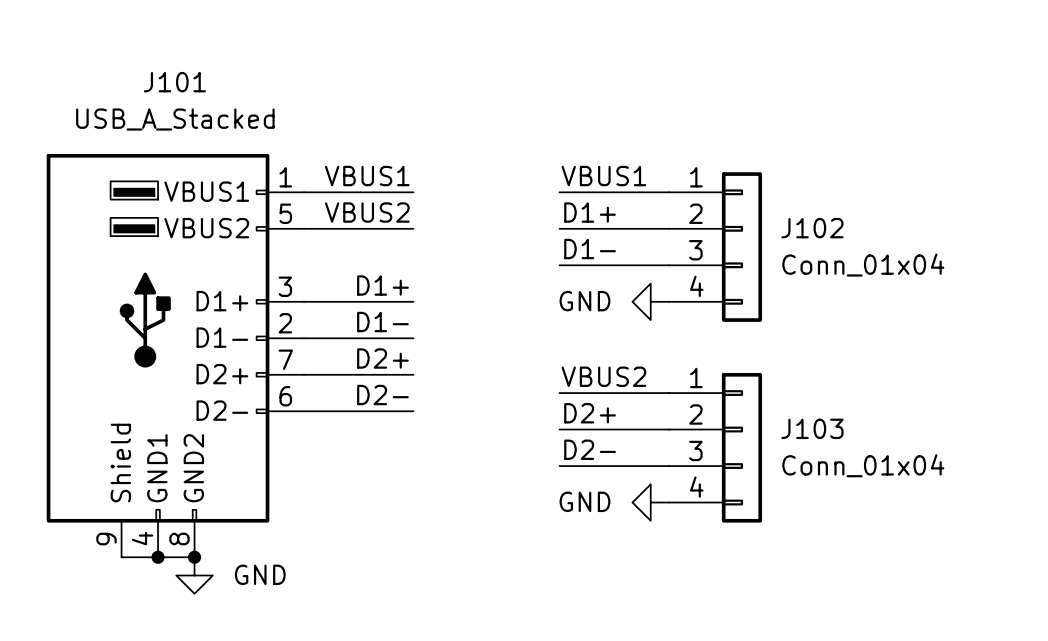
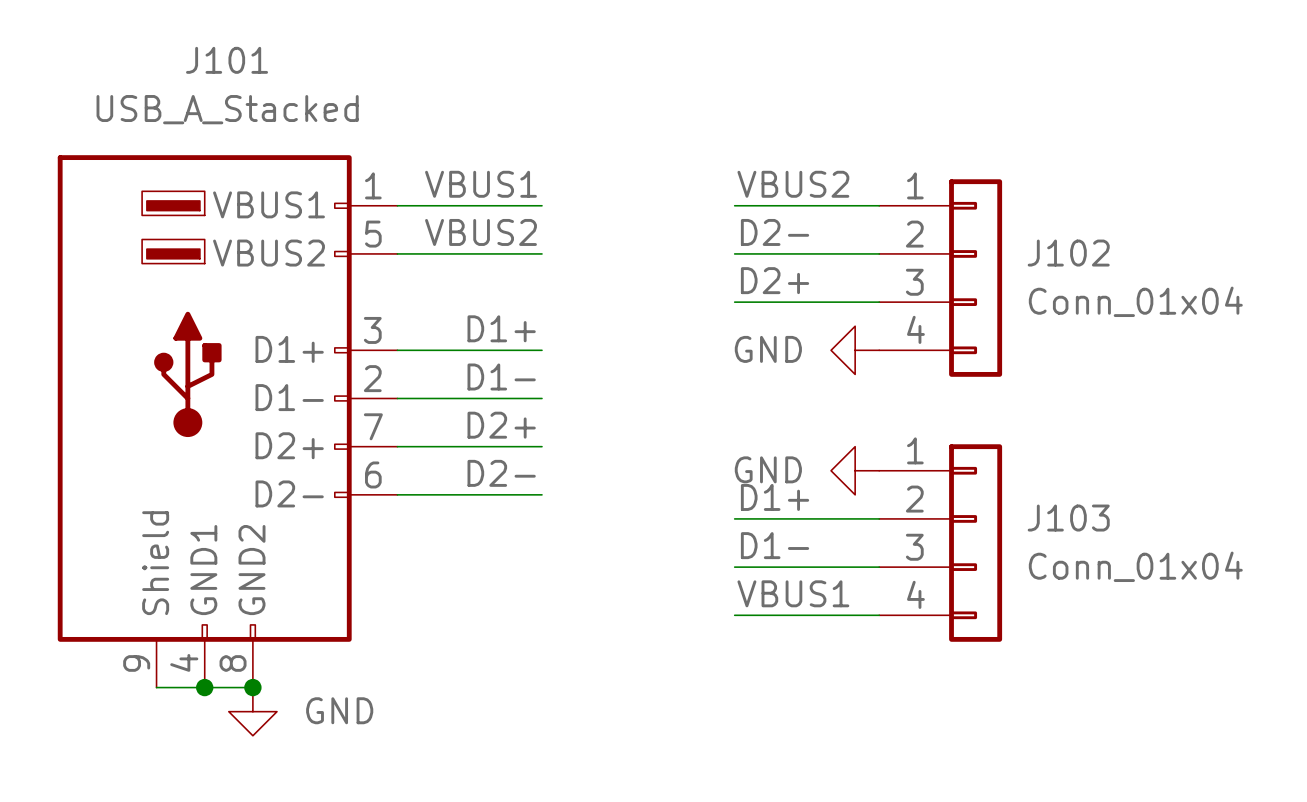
label: VBUS1 (603, 176) -> VBUS2 (793, 184)
label: D1+ (590, 212) -> D2- (775, 232)
label: D1- (590, 249) -> D2+ (775, 280)
label: VBUS2 (603, 376) -> none
wire: (559, 393) (668, 393) -> (734, 615) (879, 615)
label: D2+ (590, 413) -> D1+ (775, 497)
label: D2- (590, 449) -> D1- (775, 545)
label: none -> VBUS1 (793, 593)
power symbol position: GND (650, 502) -> GND (855, 470)

